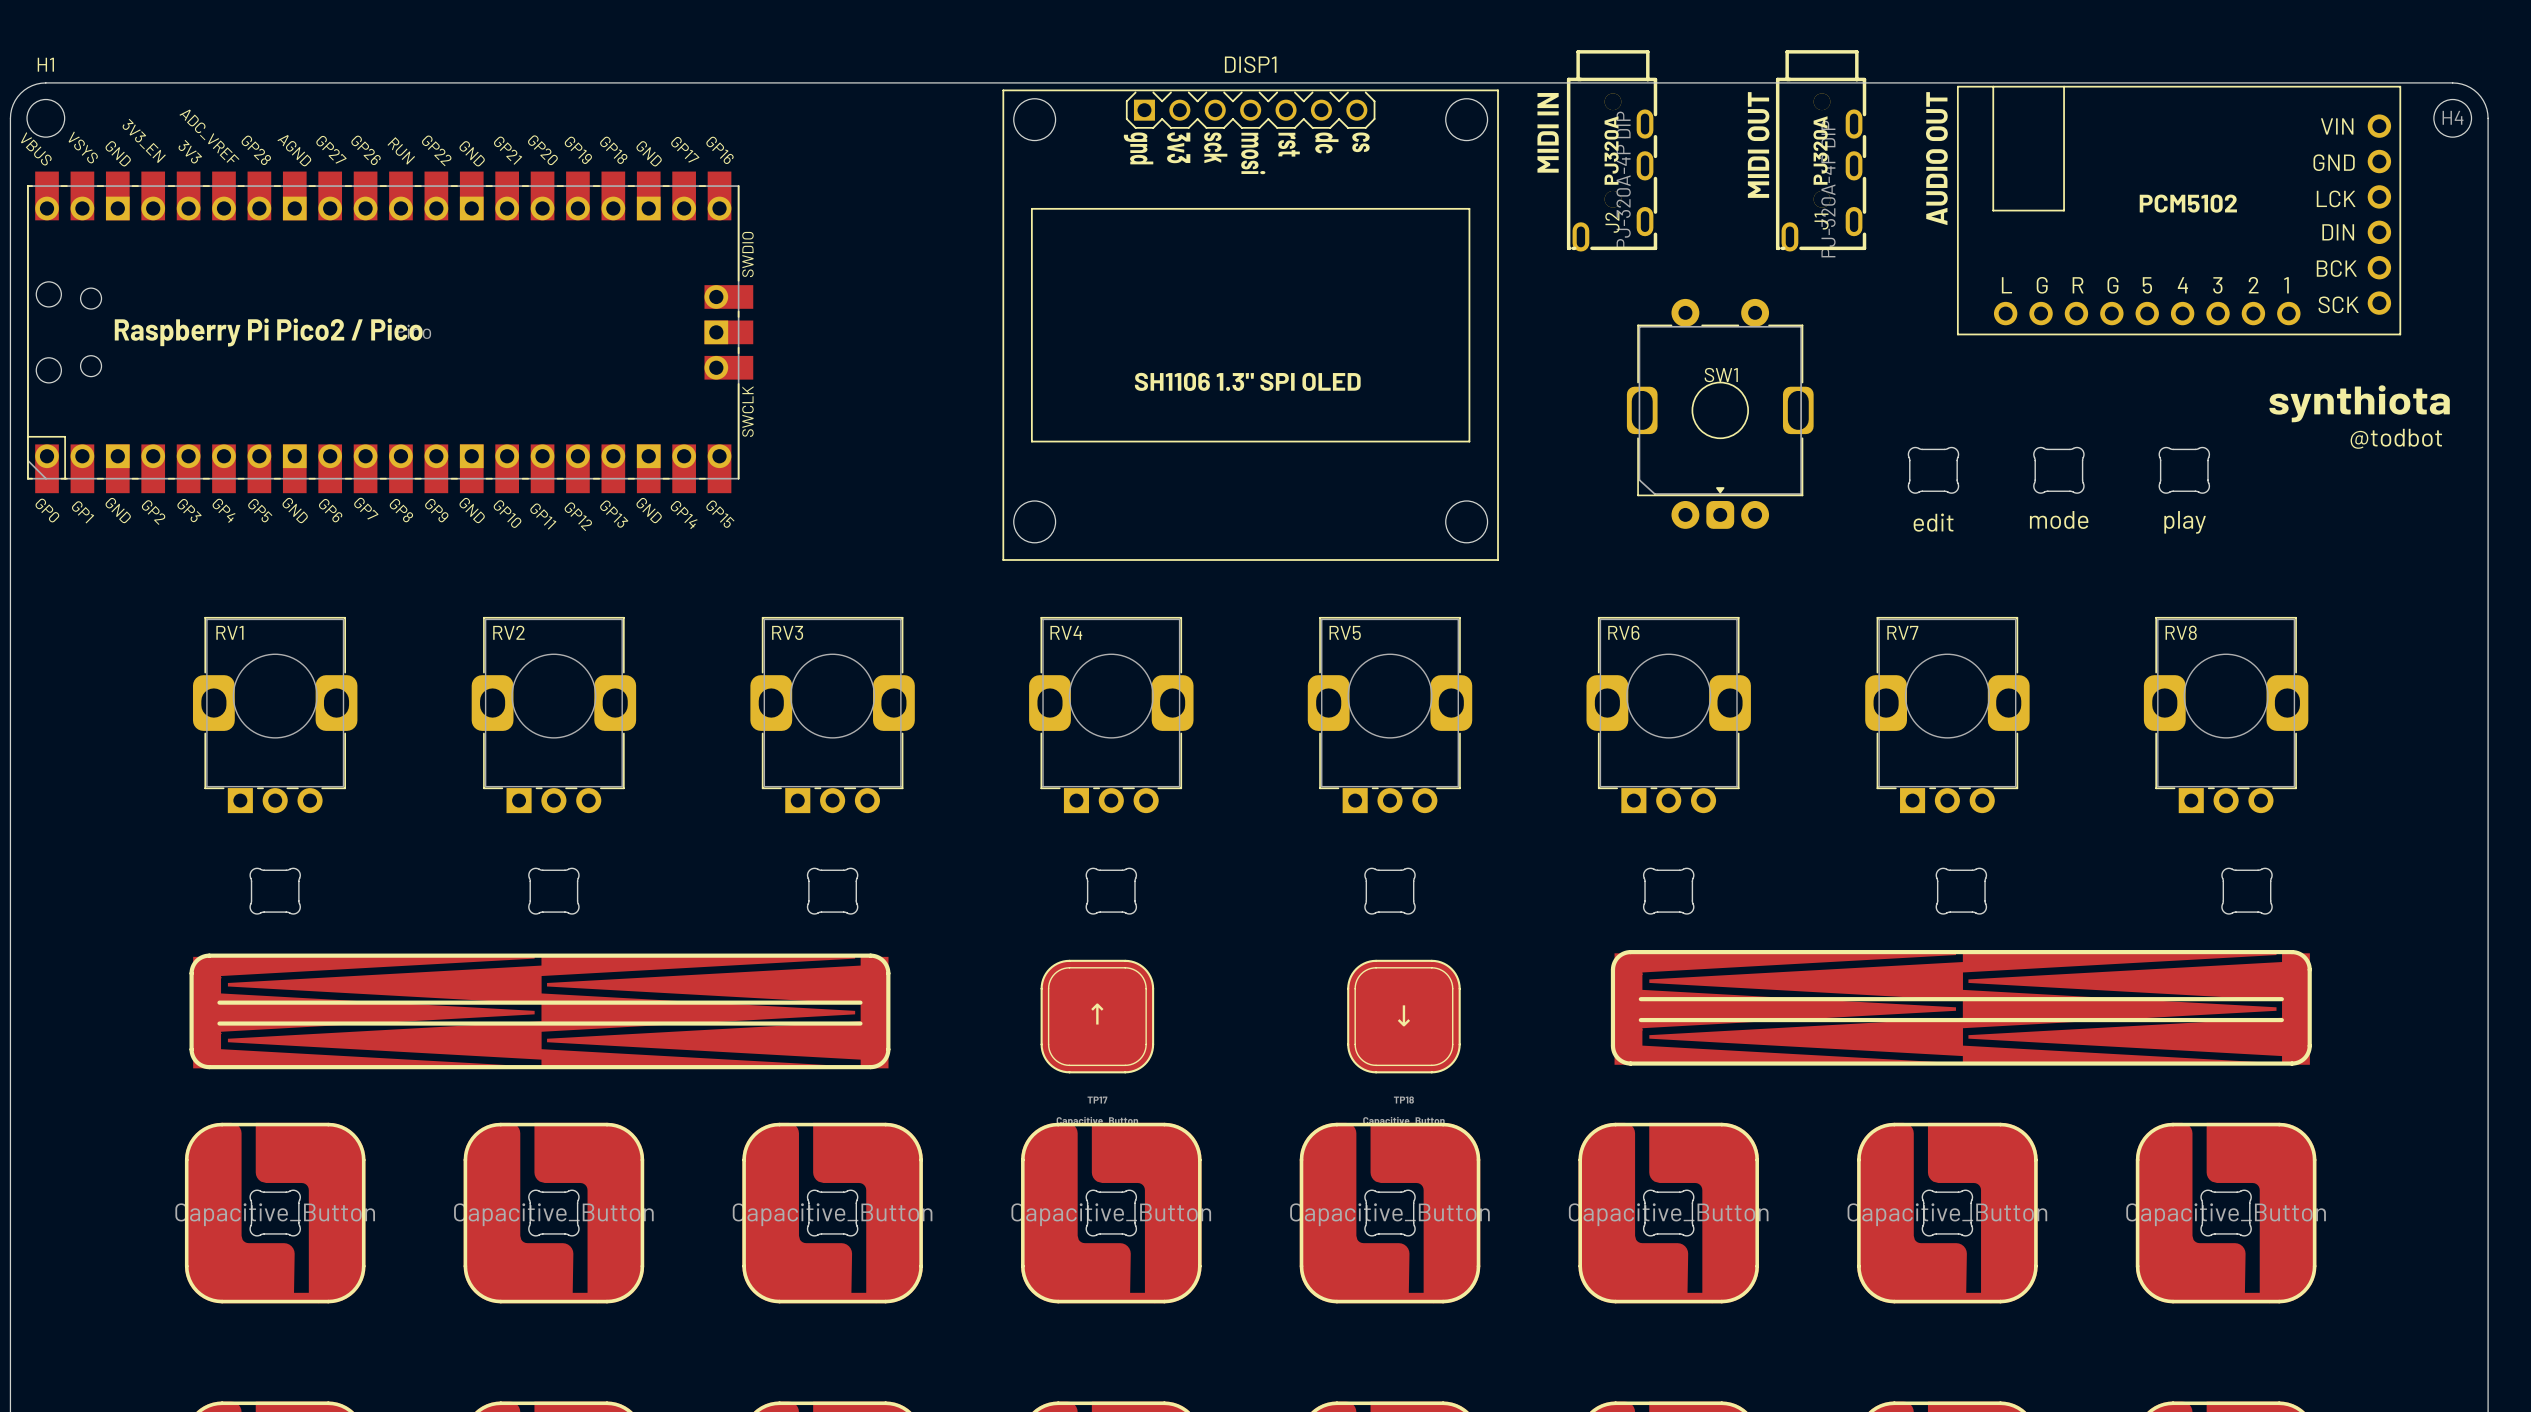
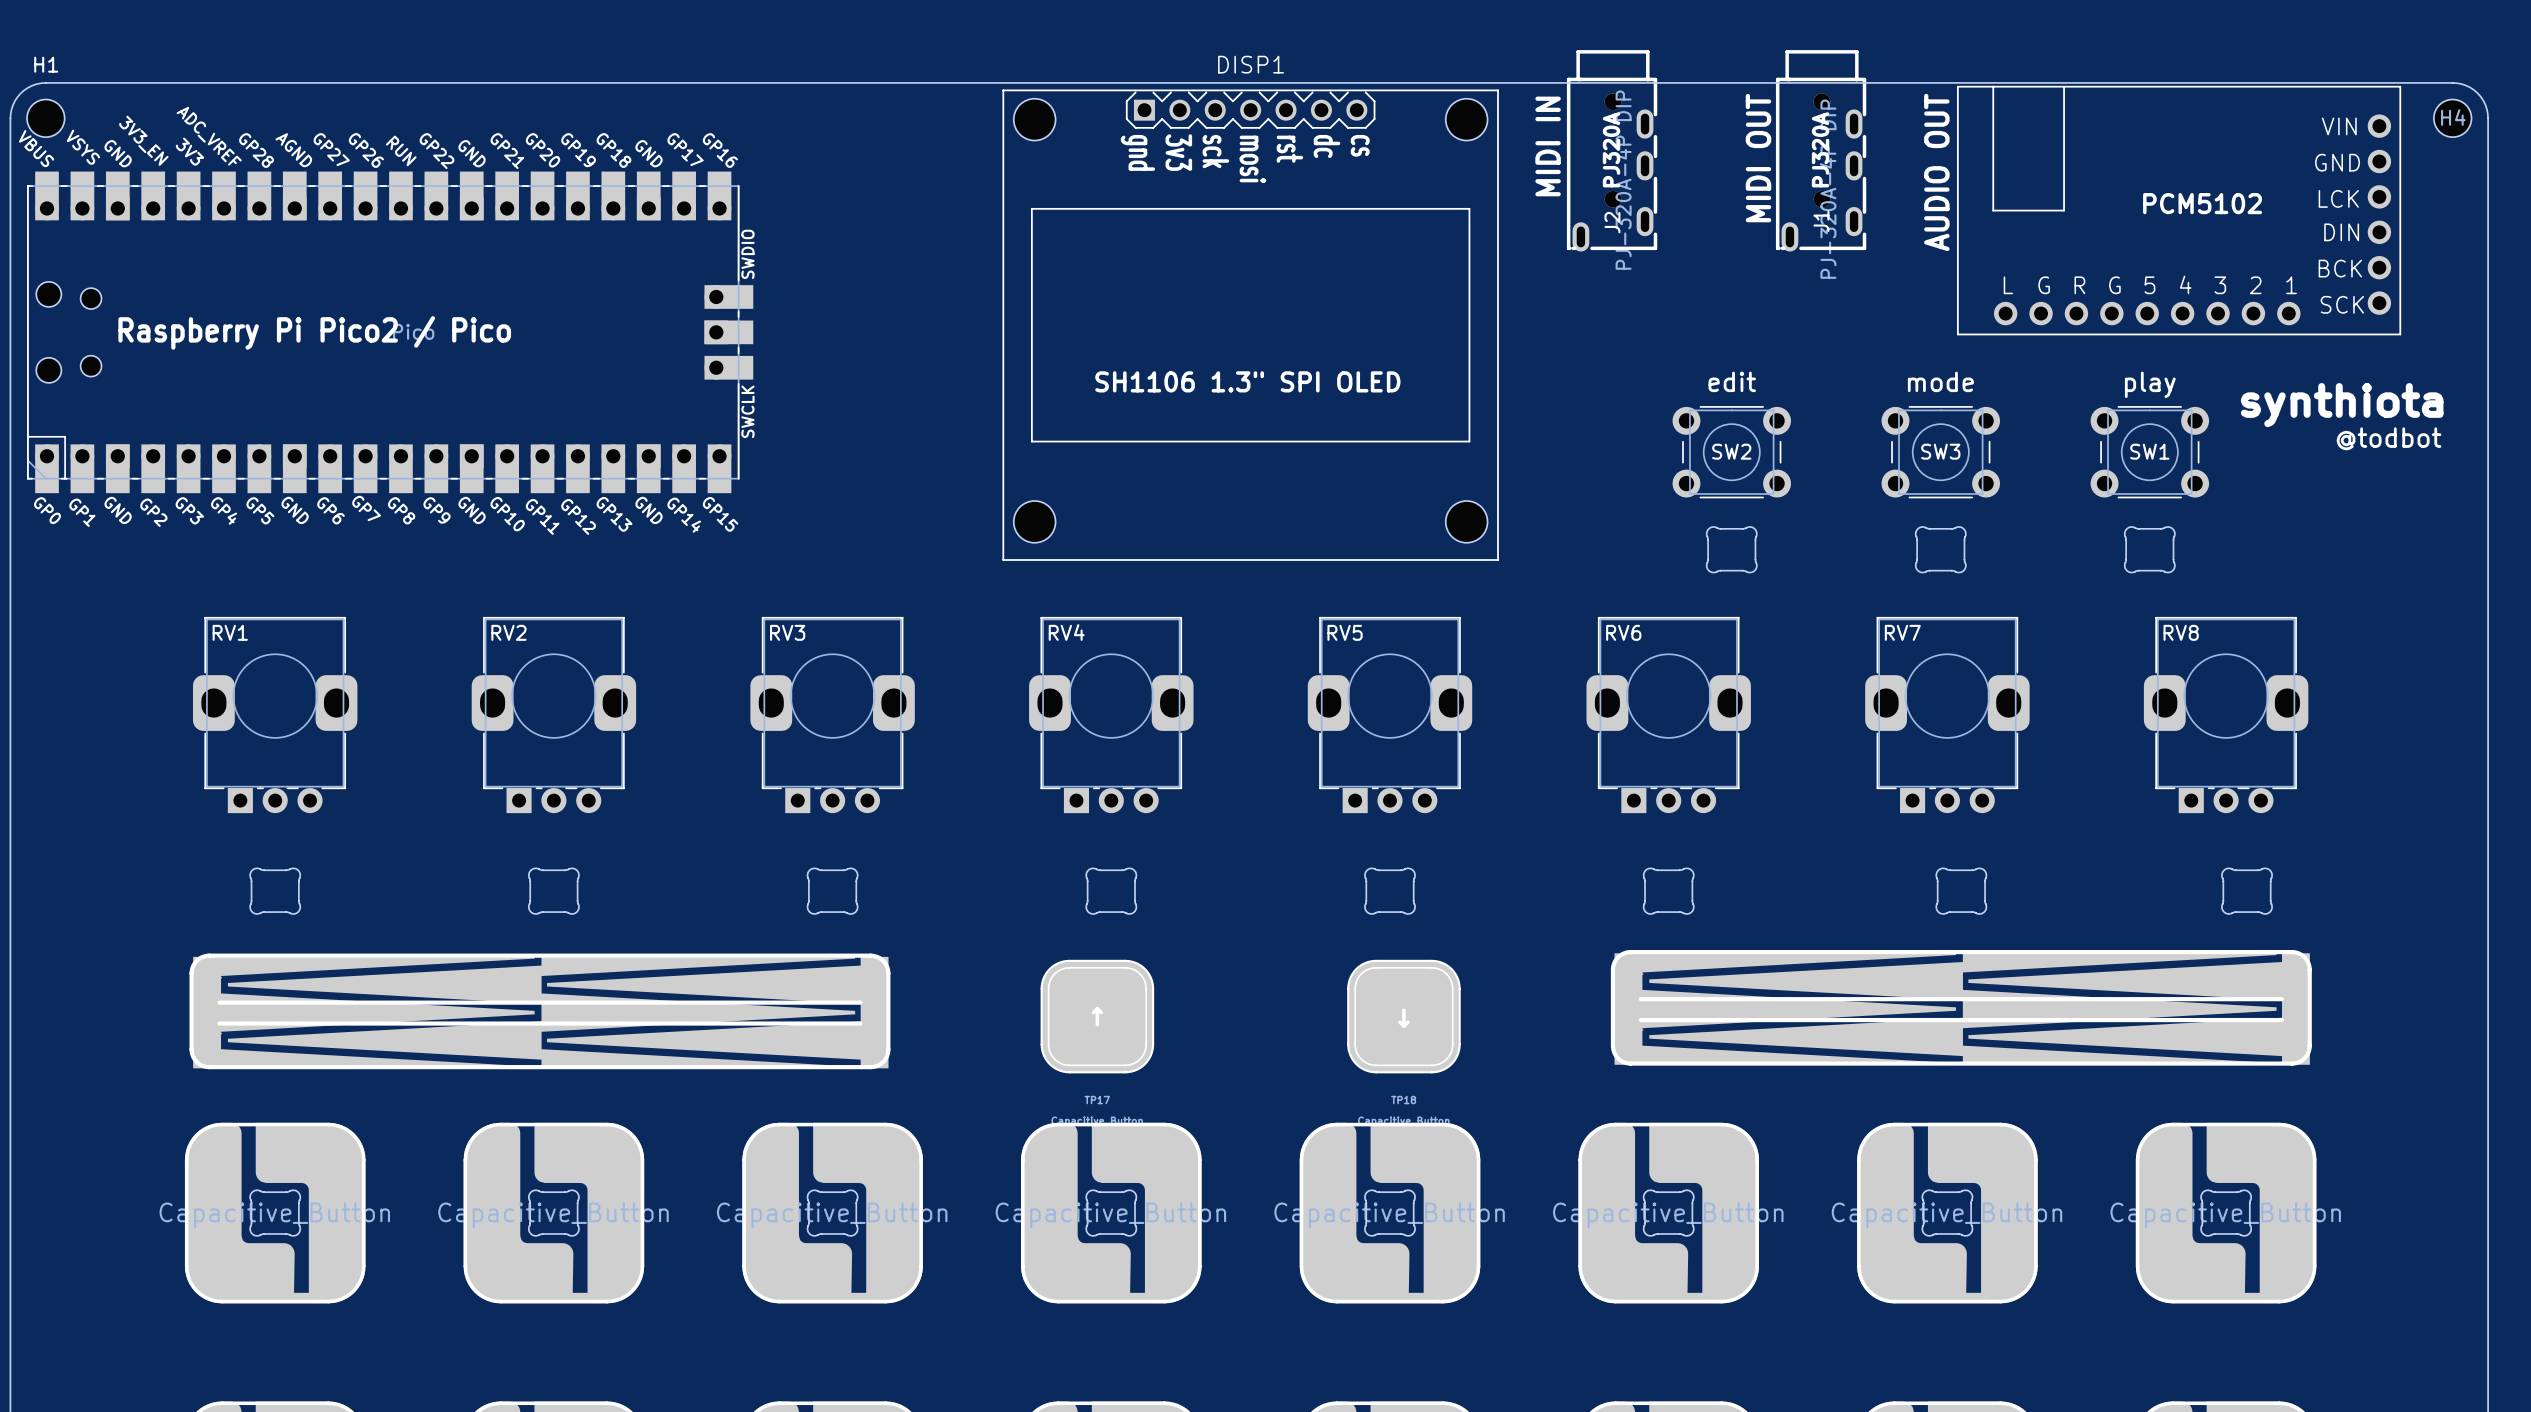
SW1 footprint: [1626, 298, 1814, 529] -> [2090, 406, 2210, 499]
SW1 name position: SW1 (1721, 375) -> SW1 (2149, 451)
SW2: none -> (1731, 452)
SW3: none -> (1940, 452)
part: (1933, 470) -> none
part: (2058, 470) -> none
part: (2184, 470) -> none
text position: mode (2059, 519) -> mode (1940, 381)
text position: edit (1933, 522) -> edit (1732, 381)
text position: play (2185, 522) -> play (2150, 384)
part: none -> (1731, 549)
part: none -> (1940, 549)
part: none -> (2149, 549)

